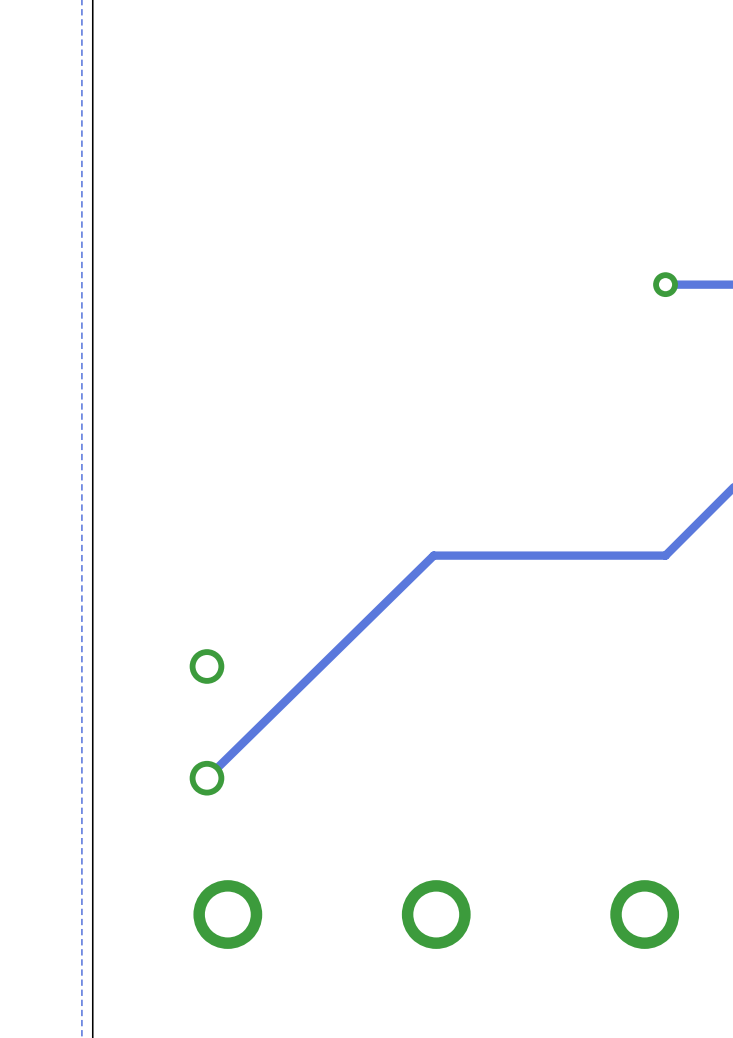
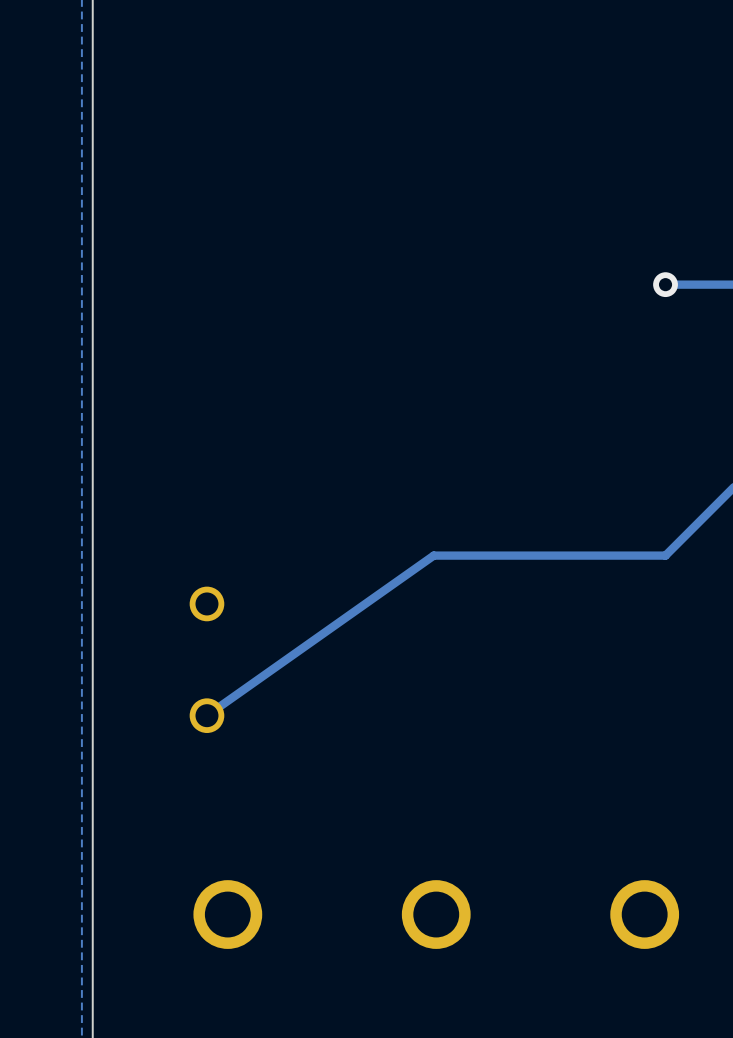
track: (433, 555) (206, 778) -> (433, 555) (206, 715)
part position: (206, 722) -> (206, 659)

